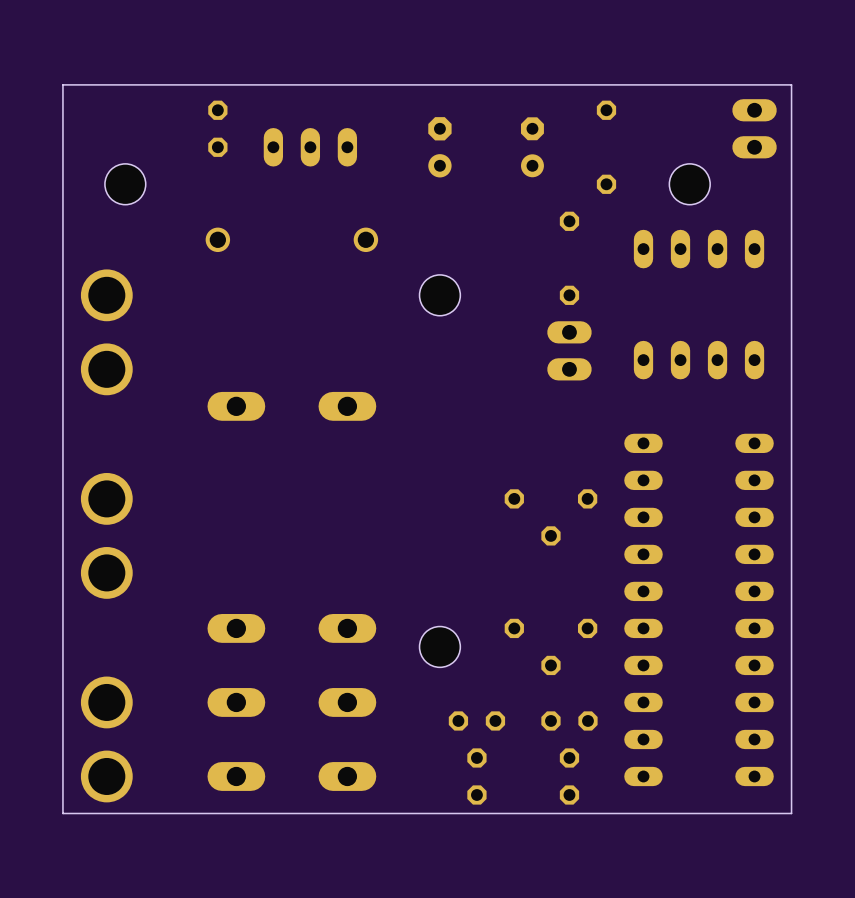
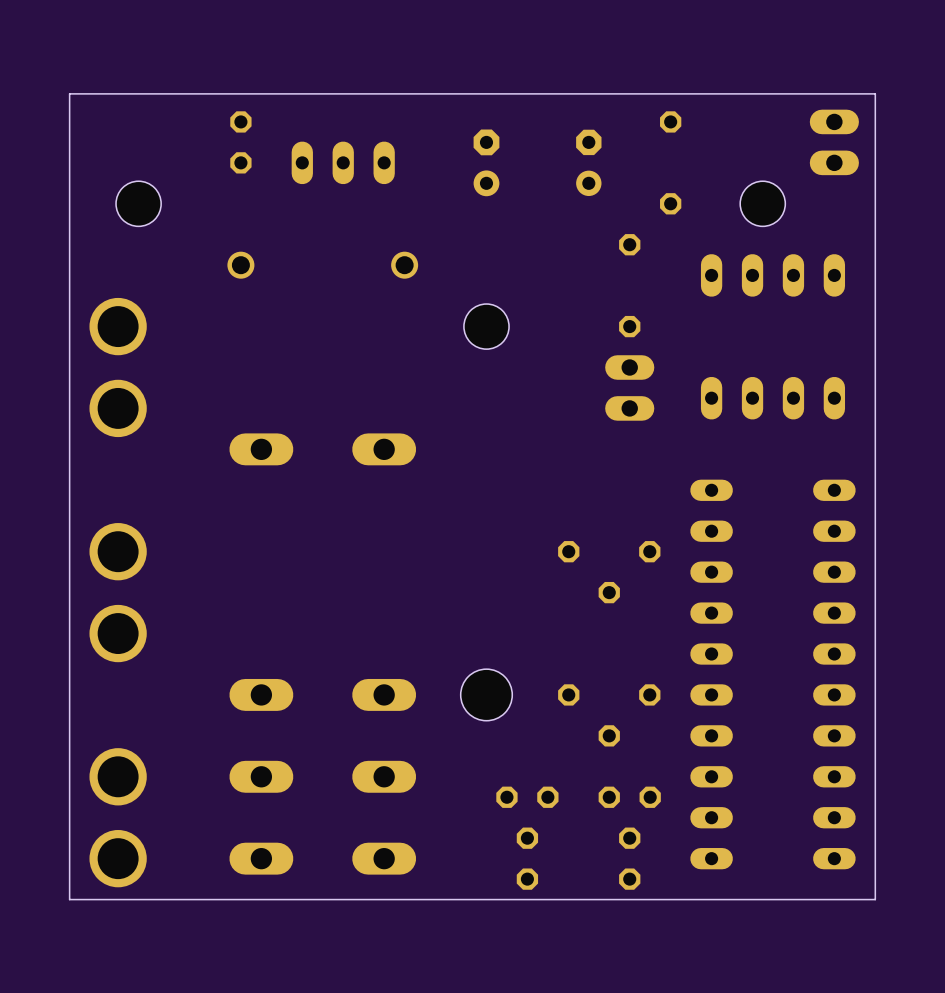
hole: none -> (486, 694)
hole: (439, 646) -> none

